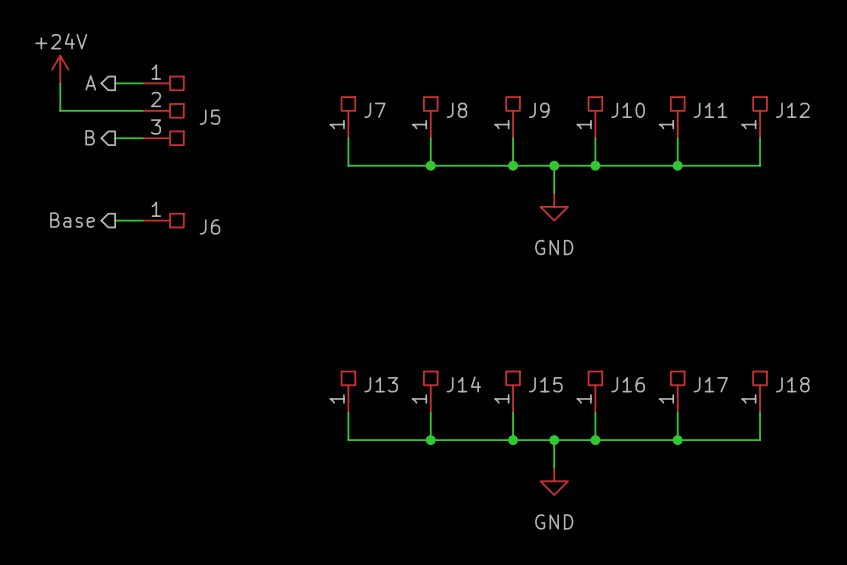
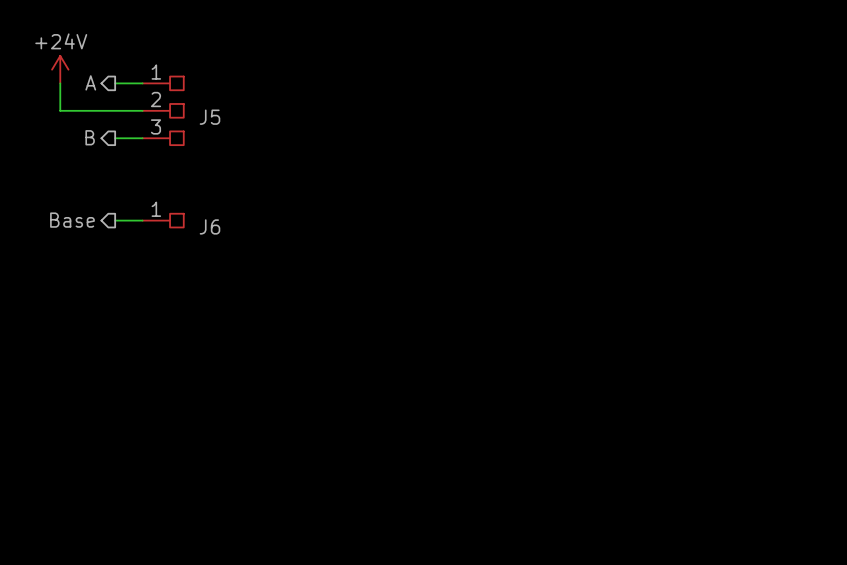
J7: (348, 117) -> none
J8: (430, 117) -> none
J9: (513, 117) -> none
J10: (595, 117) -> none
J11: (677, 117) -> none
J12: (760, 117) -> none
wire: (348, 138) (348, 165) (760, 165) (760, 138) -> none
wire: (430, 138) (430, 165) -> none
wire: (513, 138) (513, 165) -> none
wire: (595, 138) (595, 165) -> none
wire: (677, 138) (677, 165) -> none
junction: (430, 165) -> none
junction: (513, 165) -> none
wire: (554, 165) (554, 193) -> none
junction: (554, 165) -> none
junction: (595, 165) -> none
junction: (677, 165) -> none
power symbol: GND (554, 206) -> none
J13: (348, 392) -> none
J14: (430, 392) -> none
J15: (513, 392) -> none
J16: (595, 392) -> none
J17: (677, 392) -> none
J18: (760, 392) -> none
wire: (348, 412) (348, 440) (760, 440) (760, 412) -> none
wire: (430, 412) (430, 440) -> none
wire: (513, 412) (513, 440) -> none
wire: (595, 412) (595, 440) -> none
wire: (677, 412) (677, 440) -> none
junction: (430, 440) -> none
junction: (513, 440) -> none
wire: (554, 440) (554, 467) -> none
junction: (554, 440) -> none
junction: (595, 440) -> none
junction: (677, 440) -> none
power symbol: GND (554, 481) -> none

